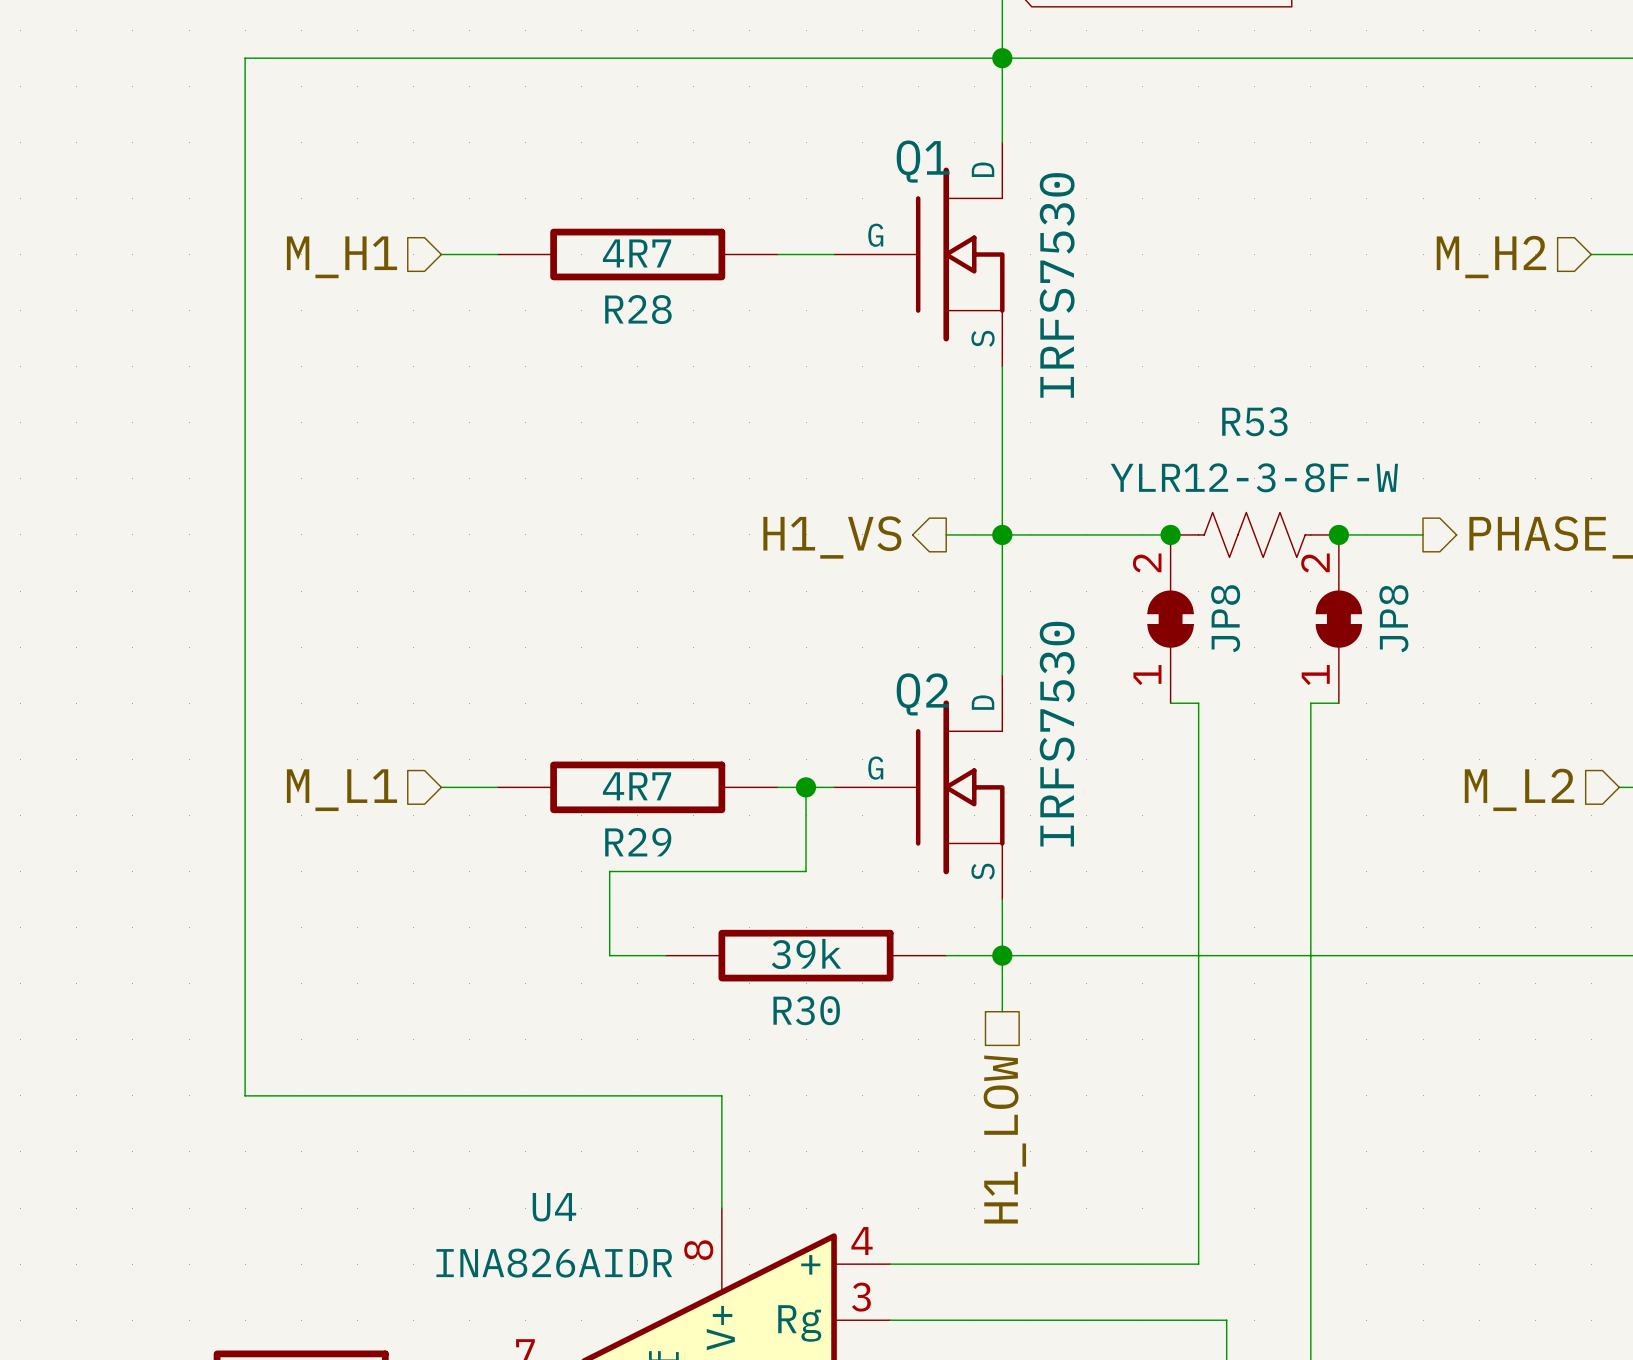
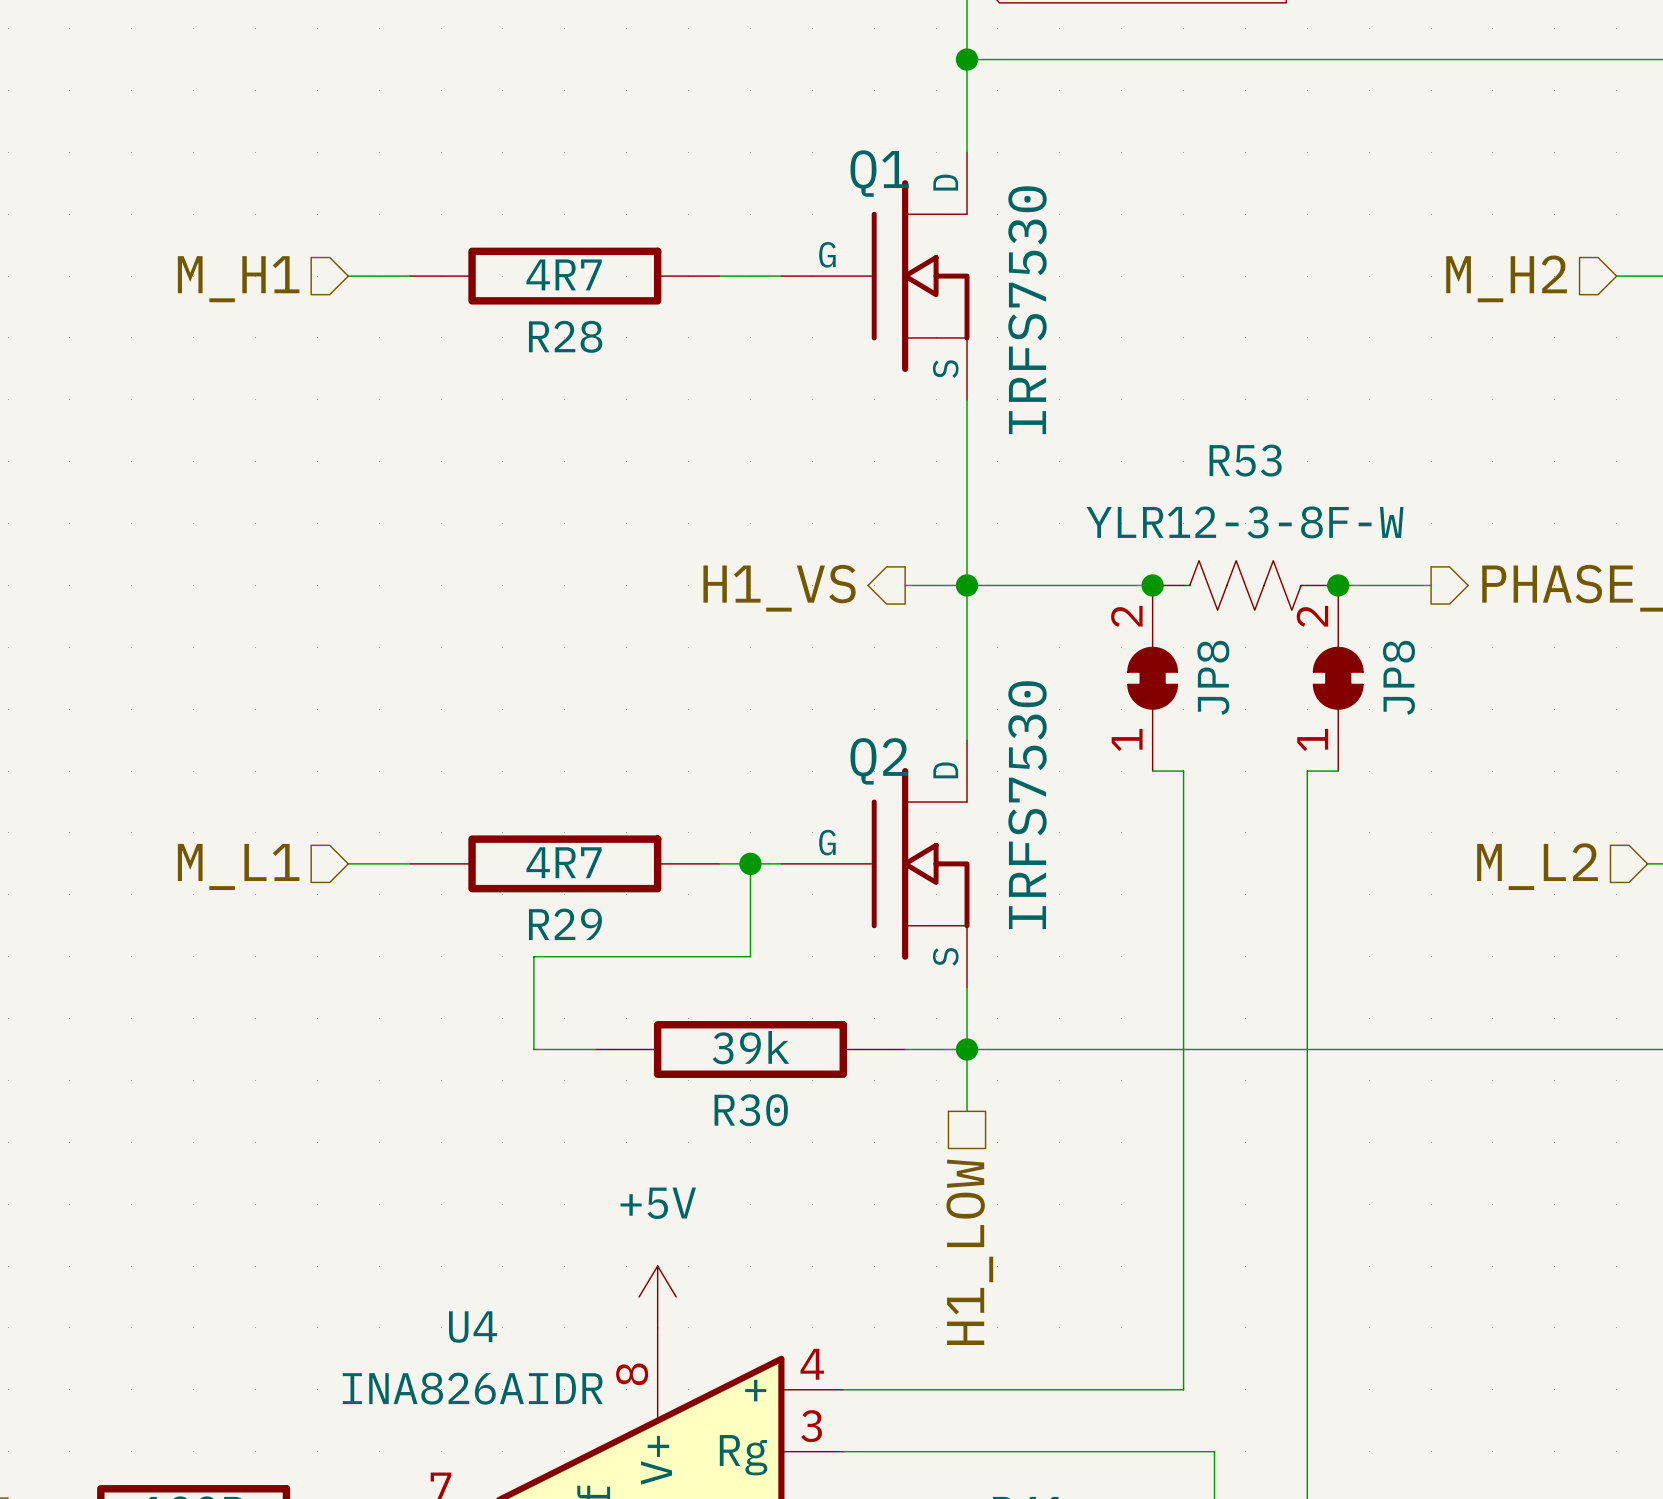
wire: (1002, 58) (245, 58) (245, 1095) (721, 1095) (721, 1208) -> none
power symbol: none -> +5V (657, 1296)

